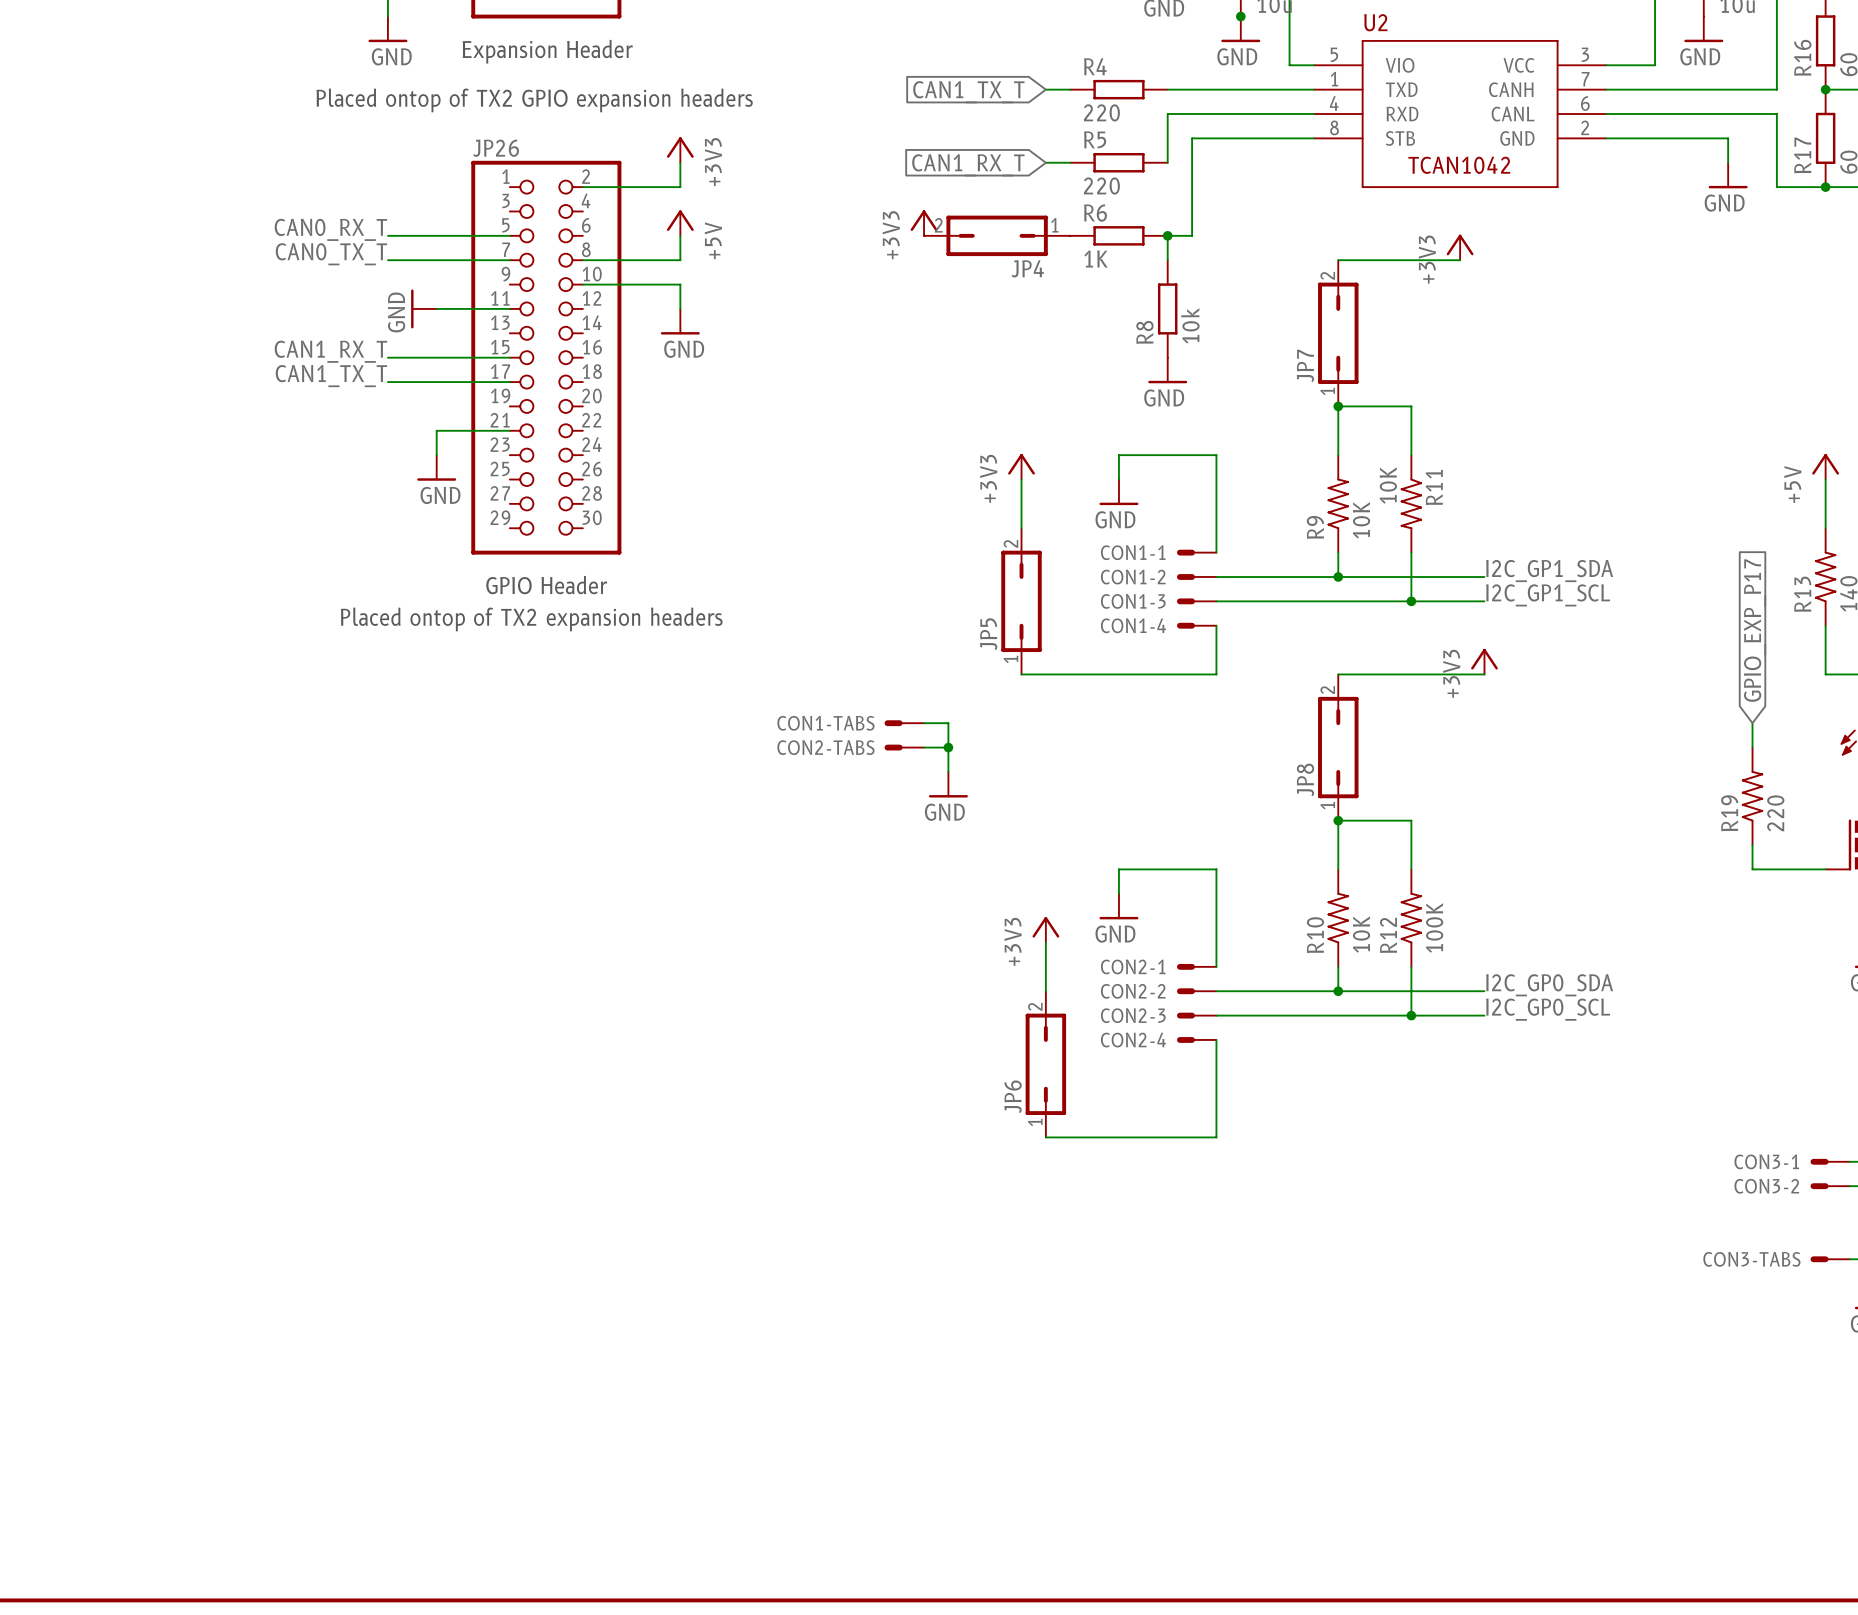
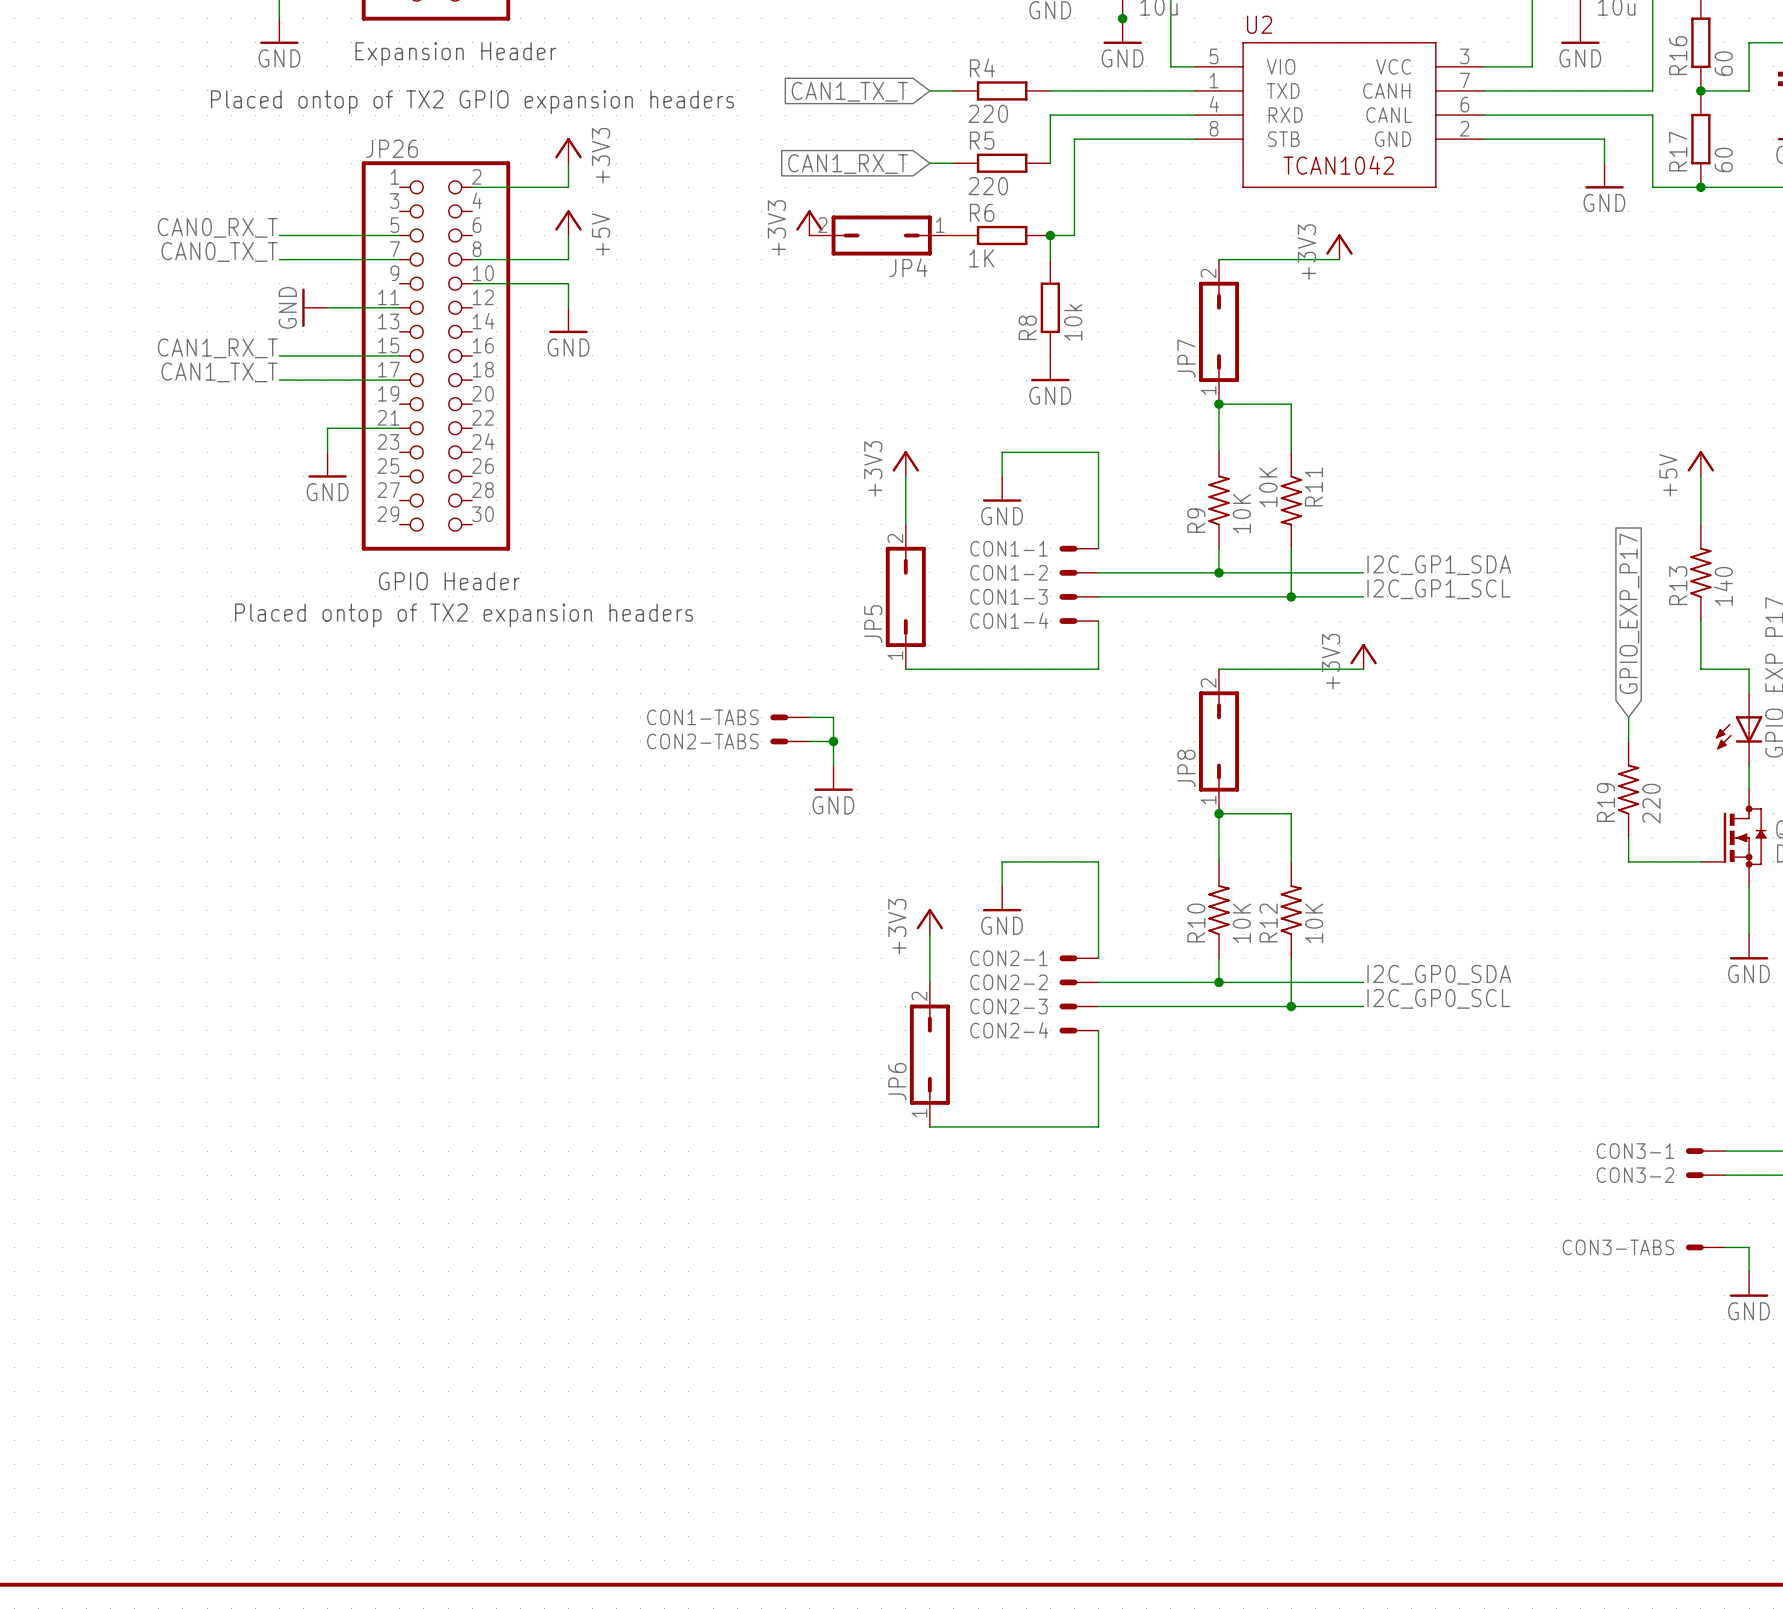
R12 value: 100K (1434, 927) -> 10K (1314, 923)

